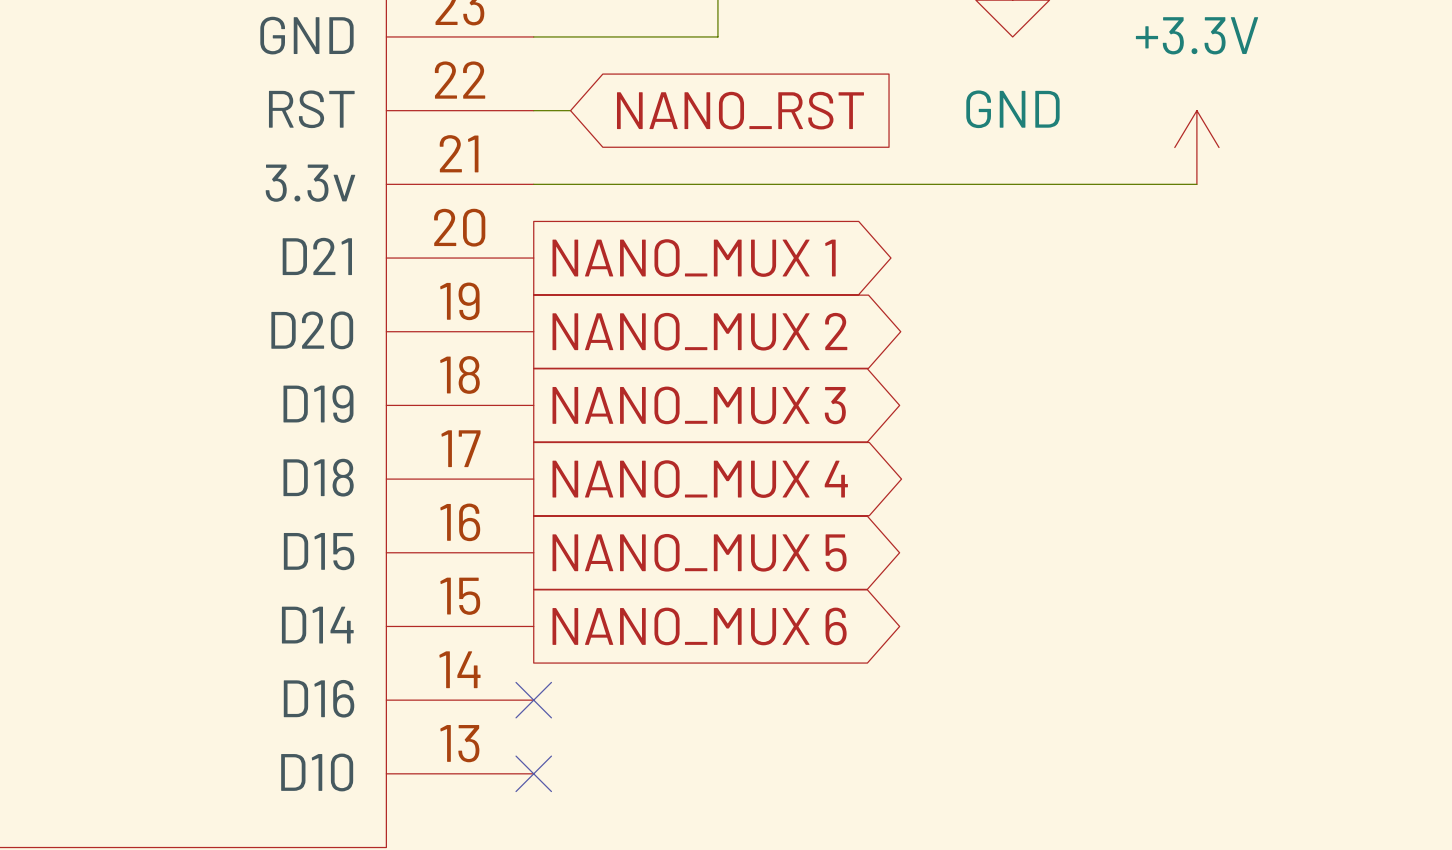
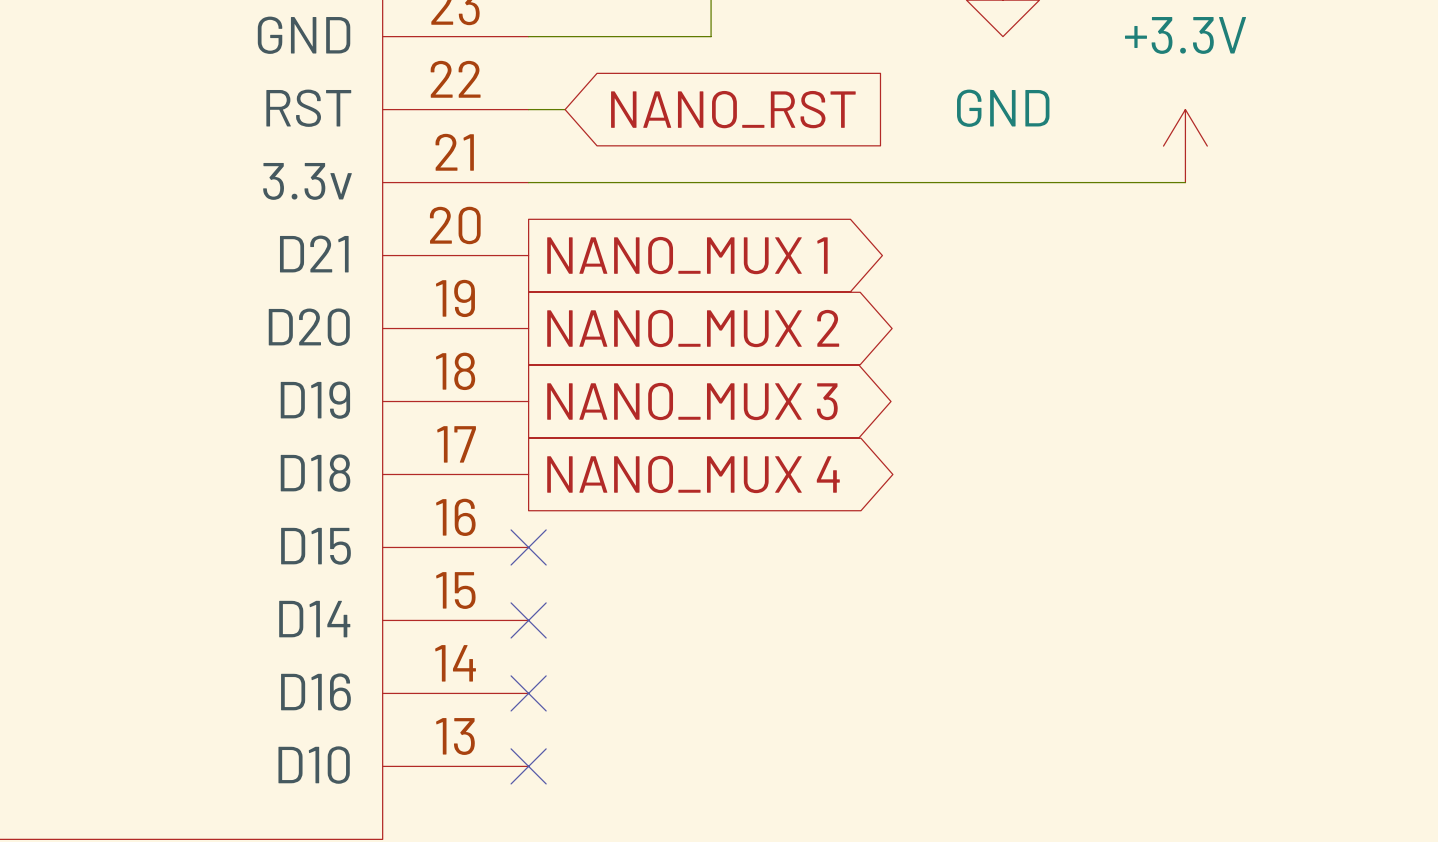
no-connect mark: none -> (528, 547)
global label: NANO_MUX 5 (699, 552) -> none
no-connect mark: none -> (528, 620)
global label: NANO_MUX 6 (699, 626) -> none

